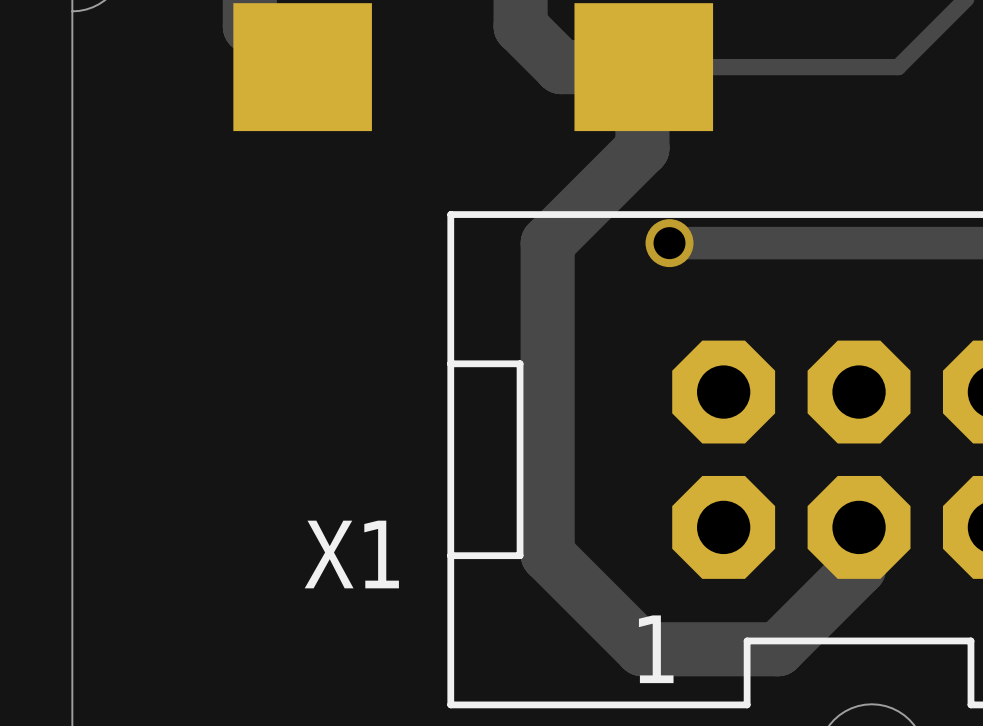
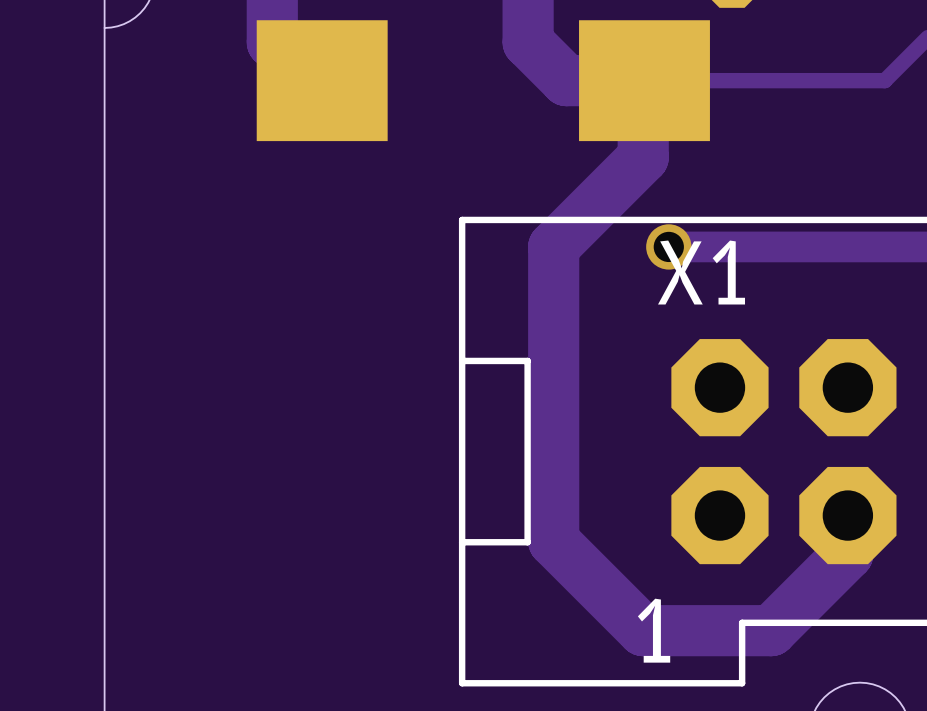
X1 name position: X1 (351, 554) -> X1 (701, 272)

